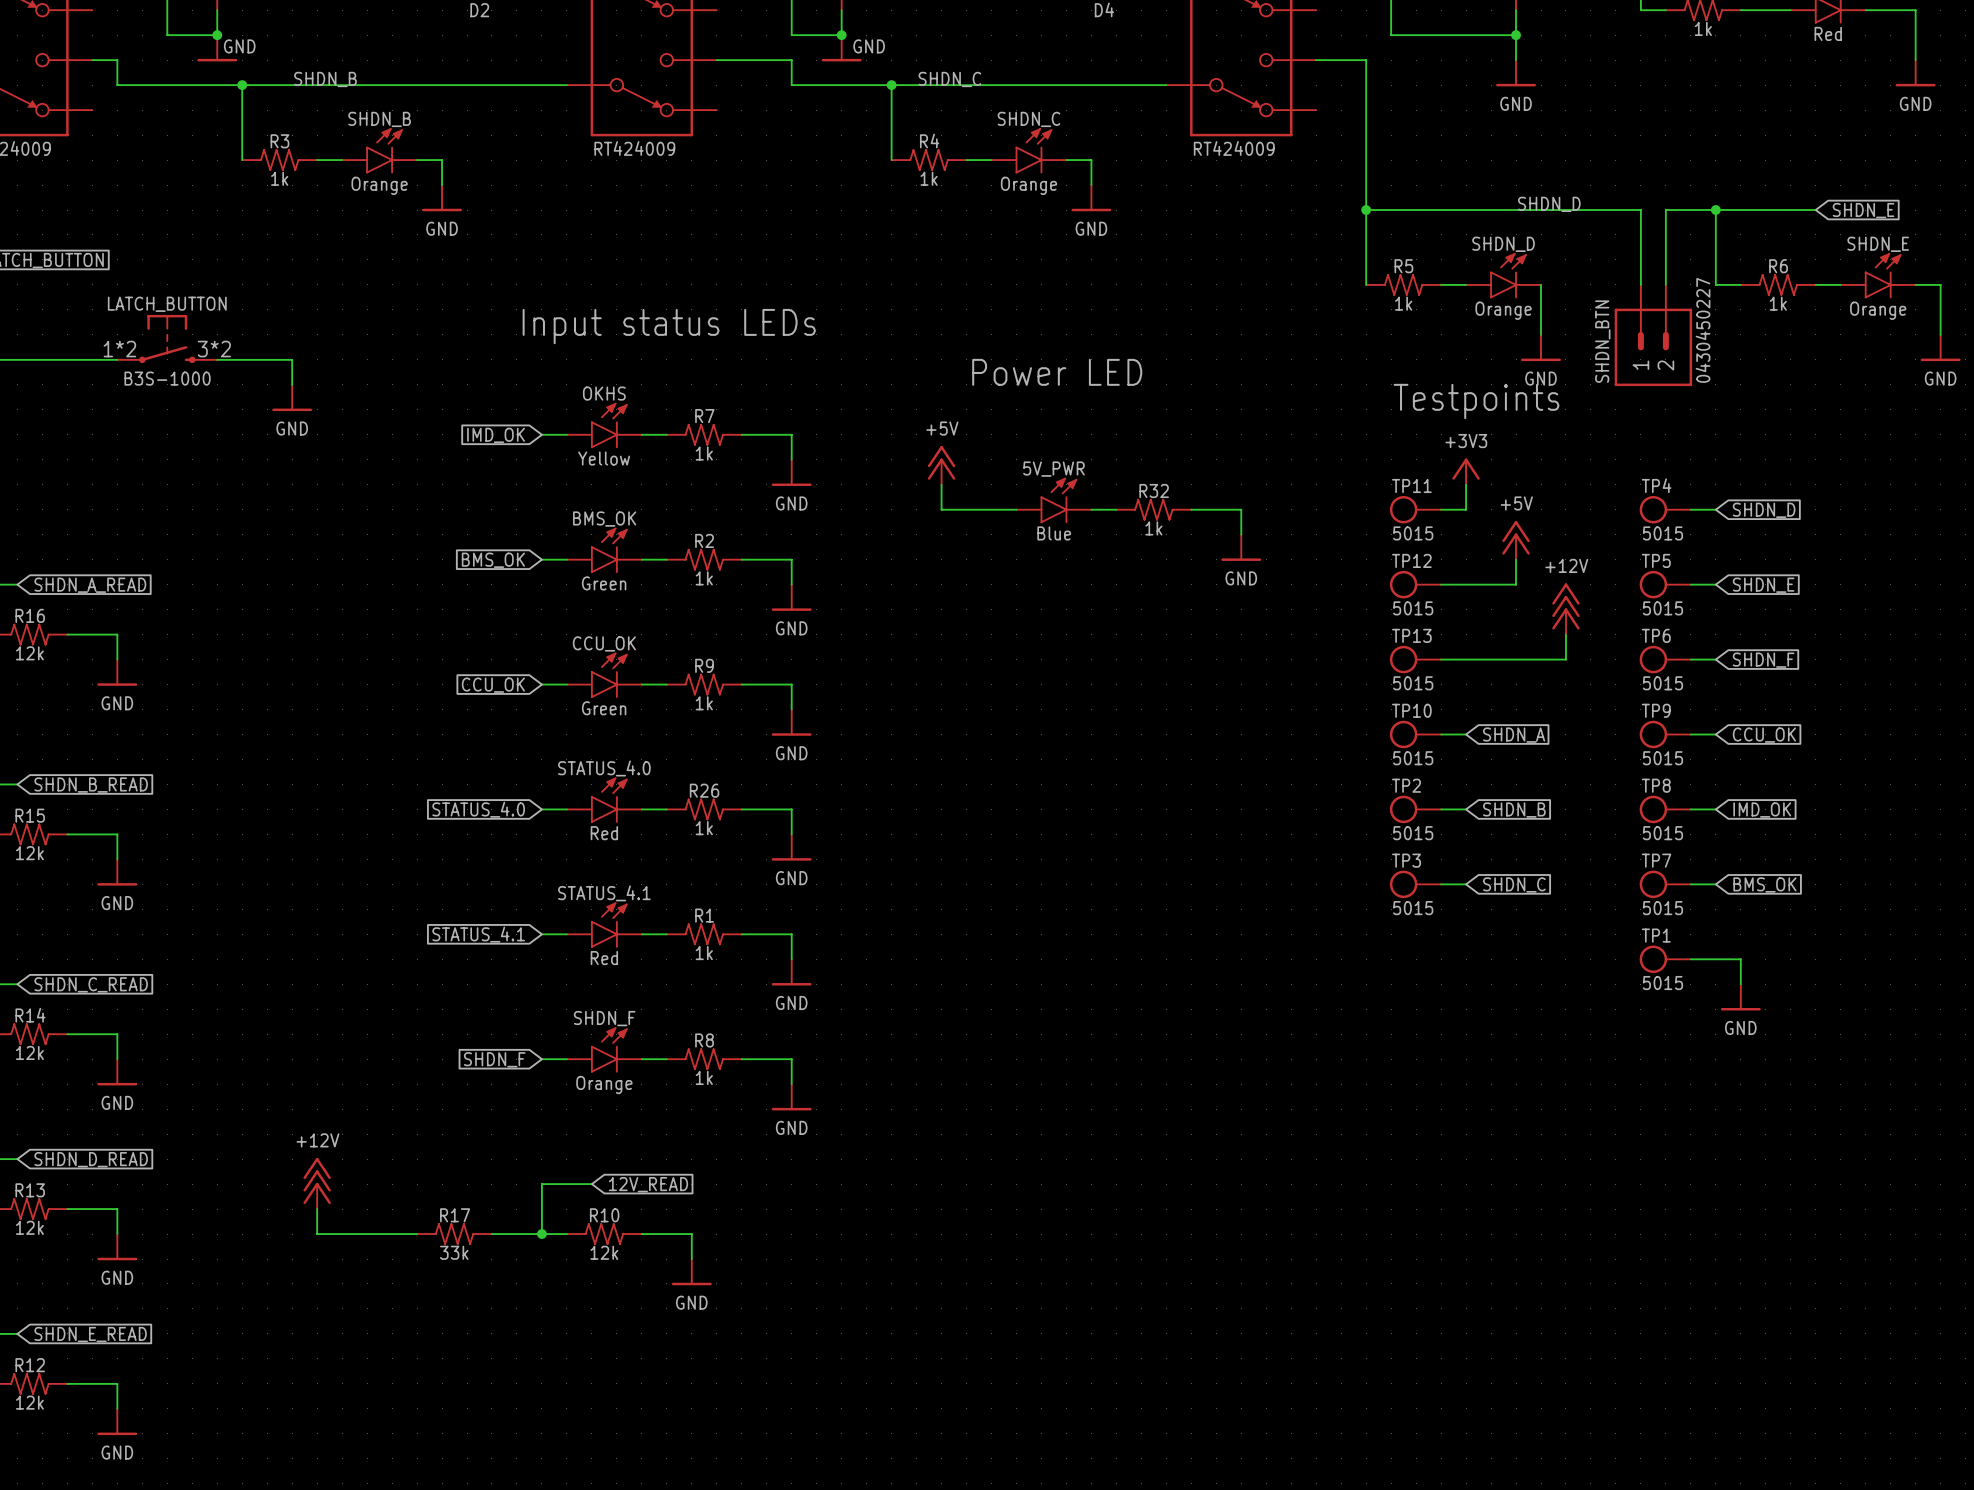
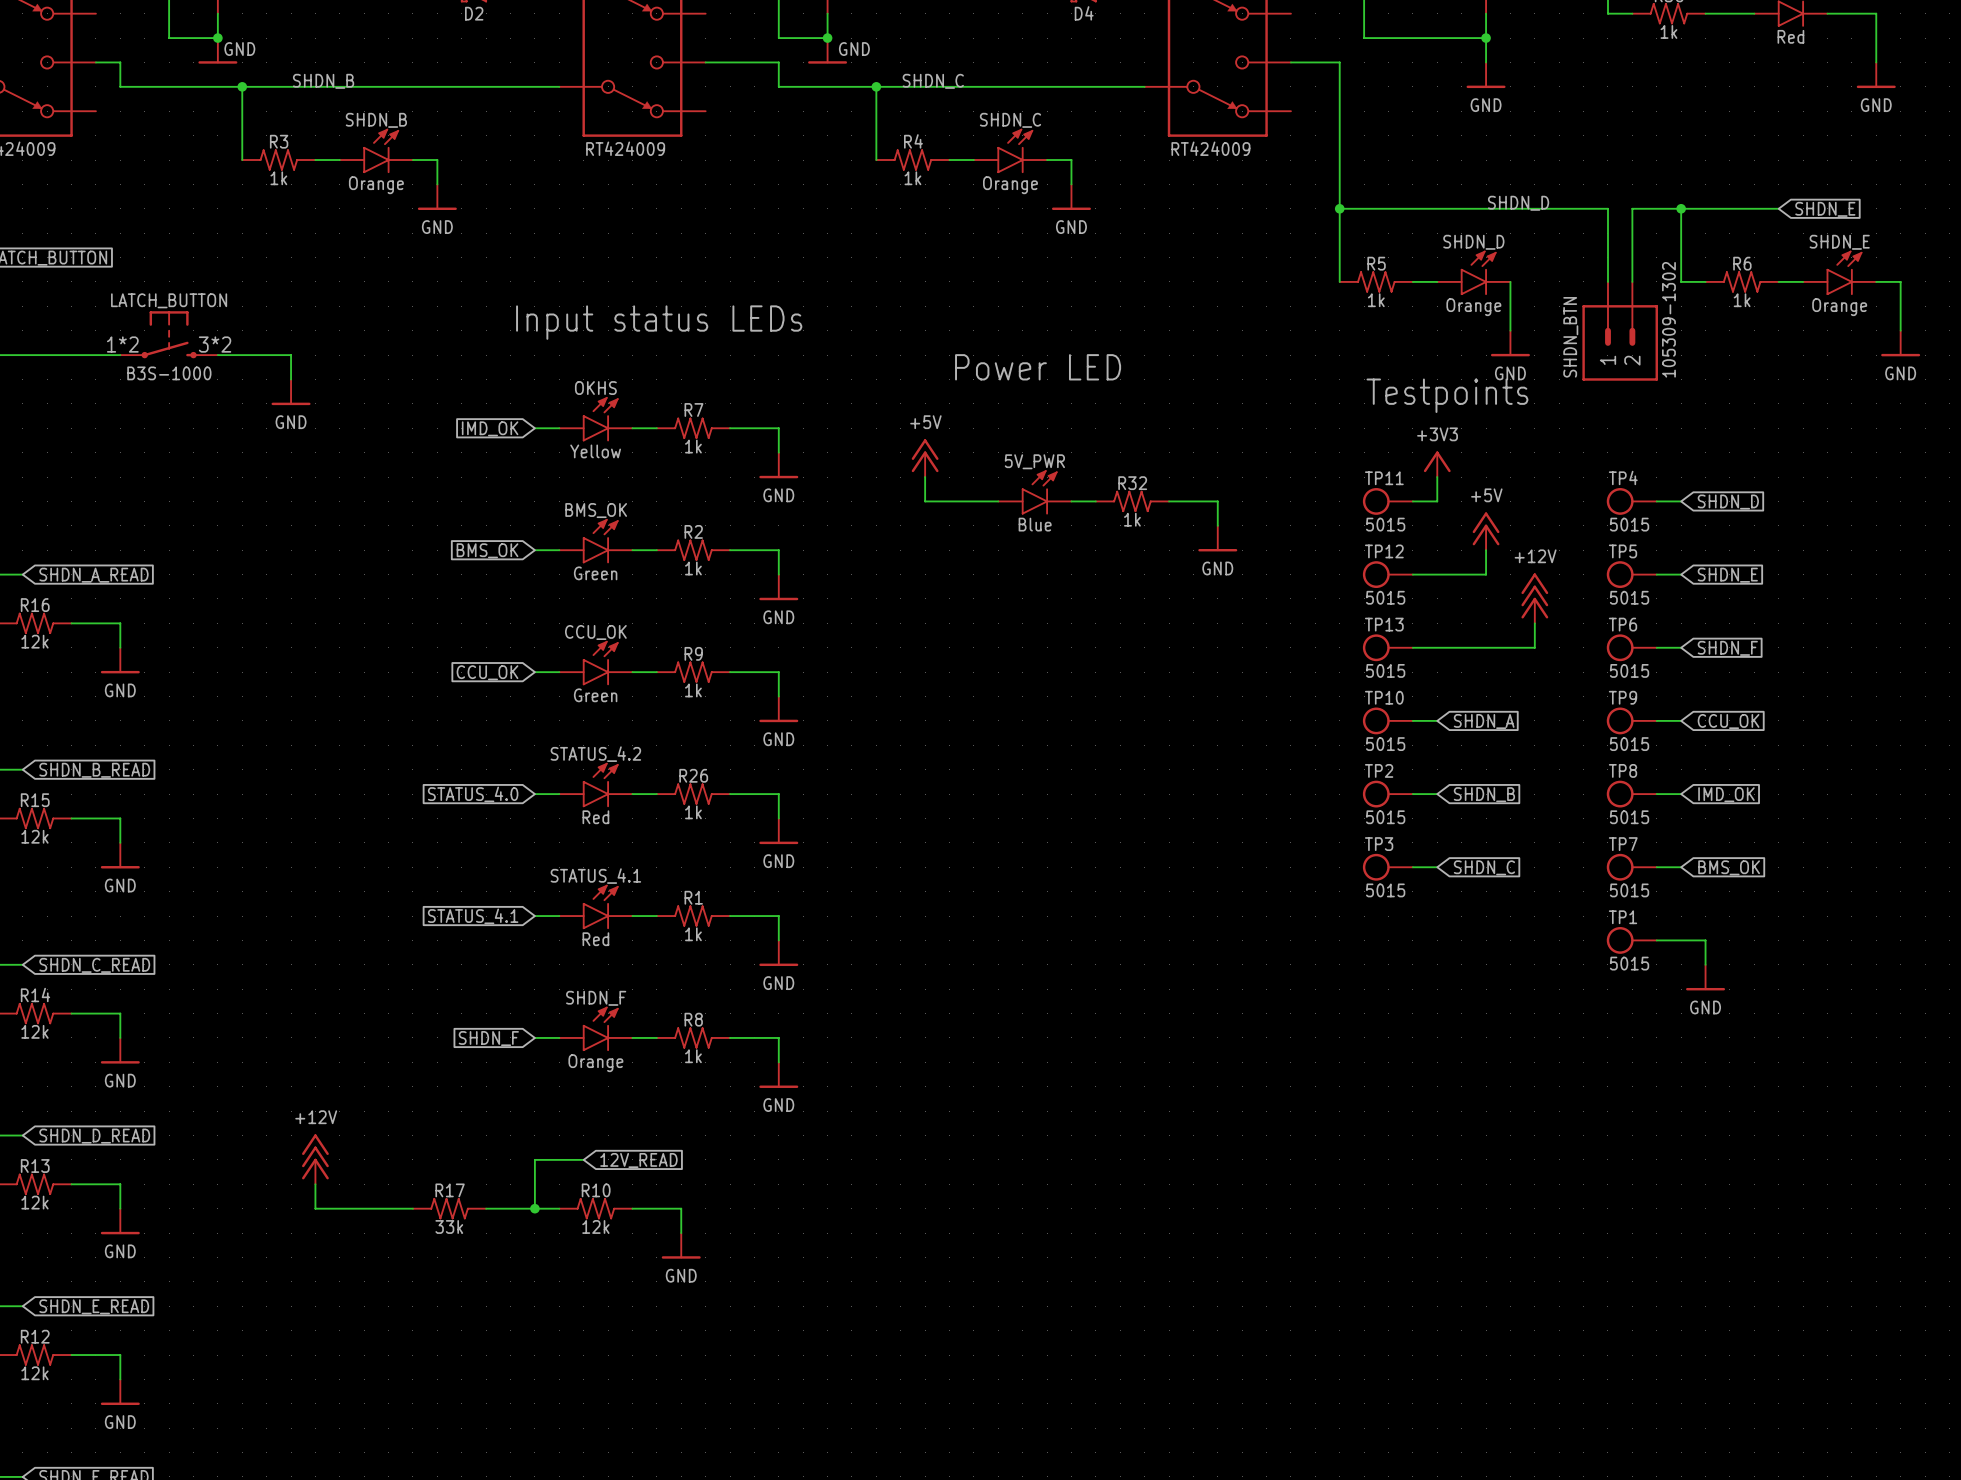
SHDN_BTN text: 0430450227 (1703, 330) -> 105309-1302 (1668, 319)
STATUS_4.0 name: STATUS_4.0 (604, 768) -> STATUS_4.2 (595, 754)

